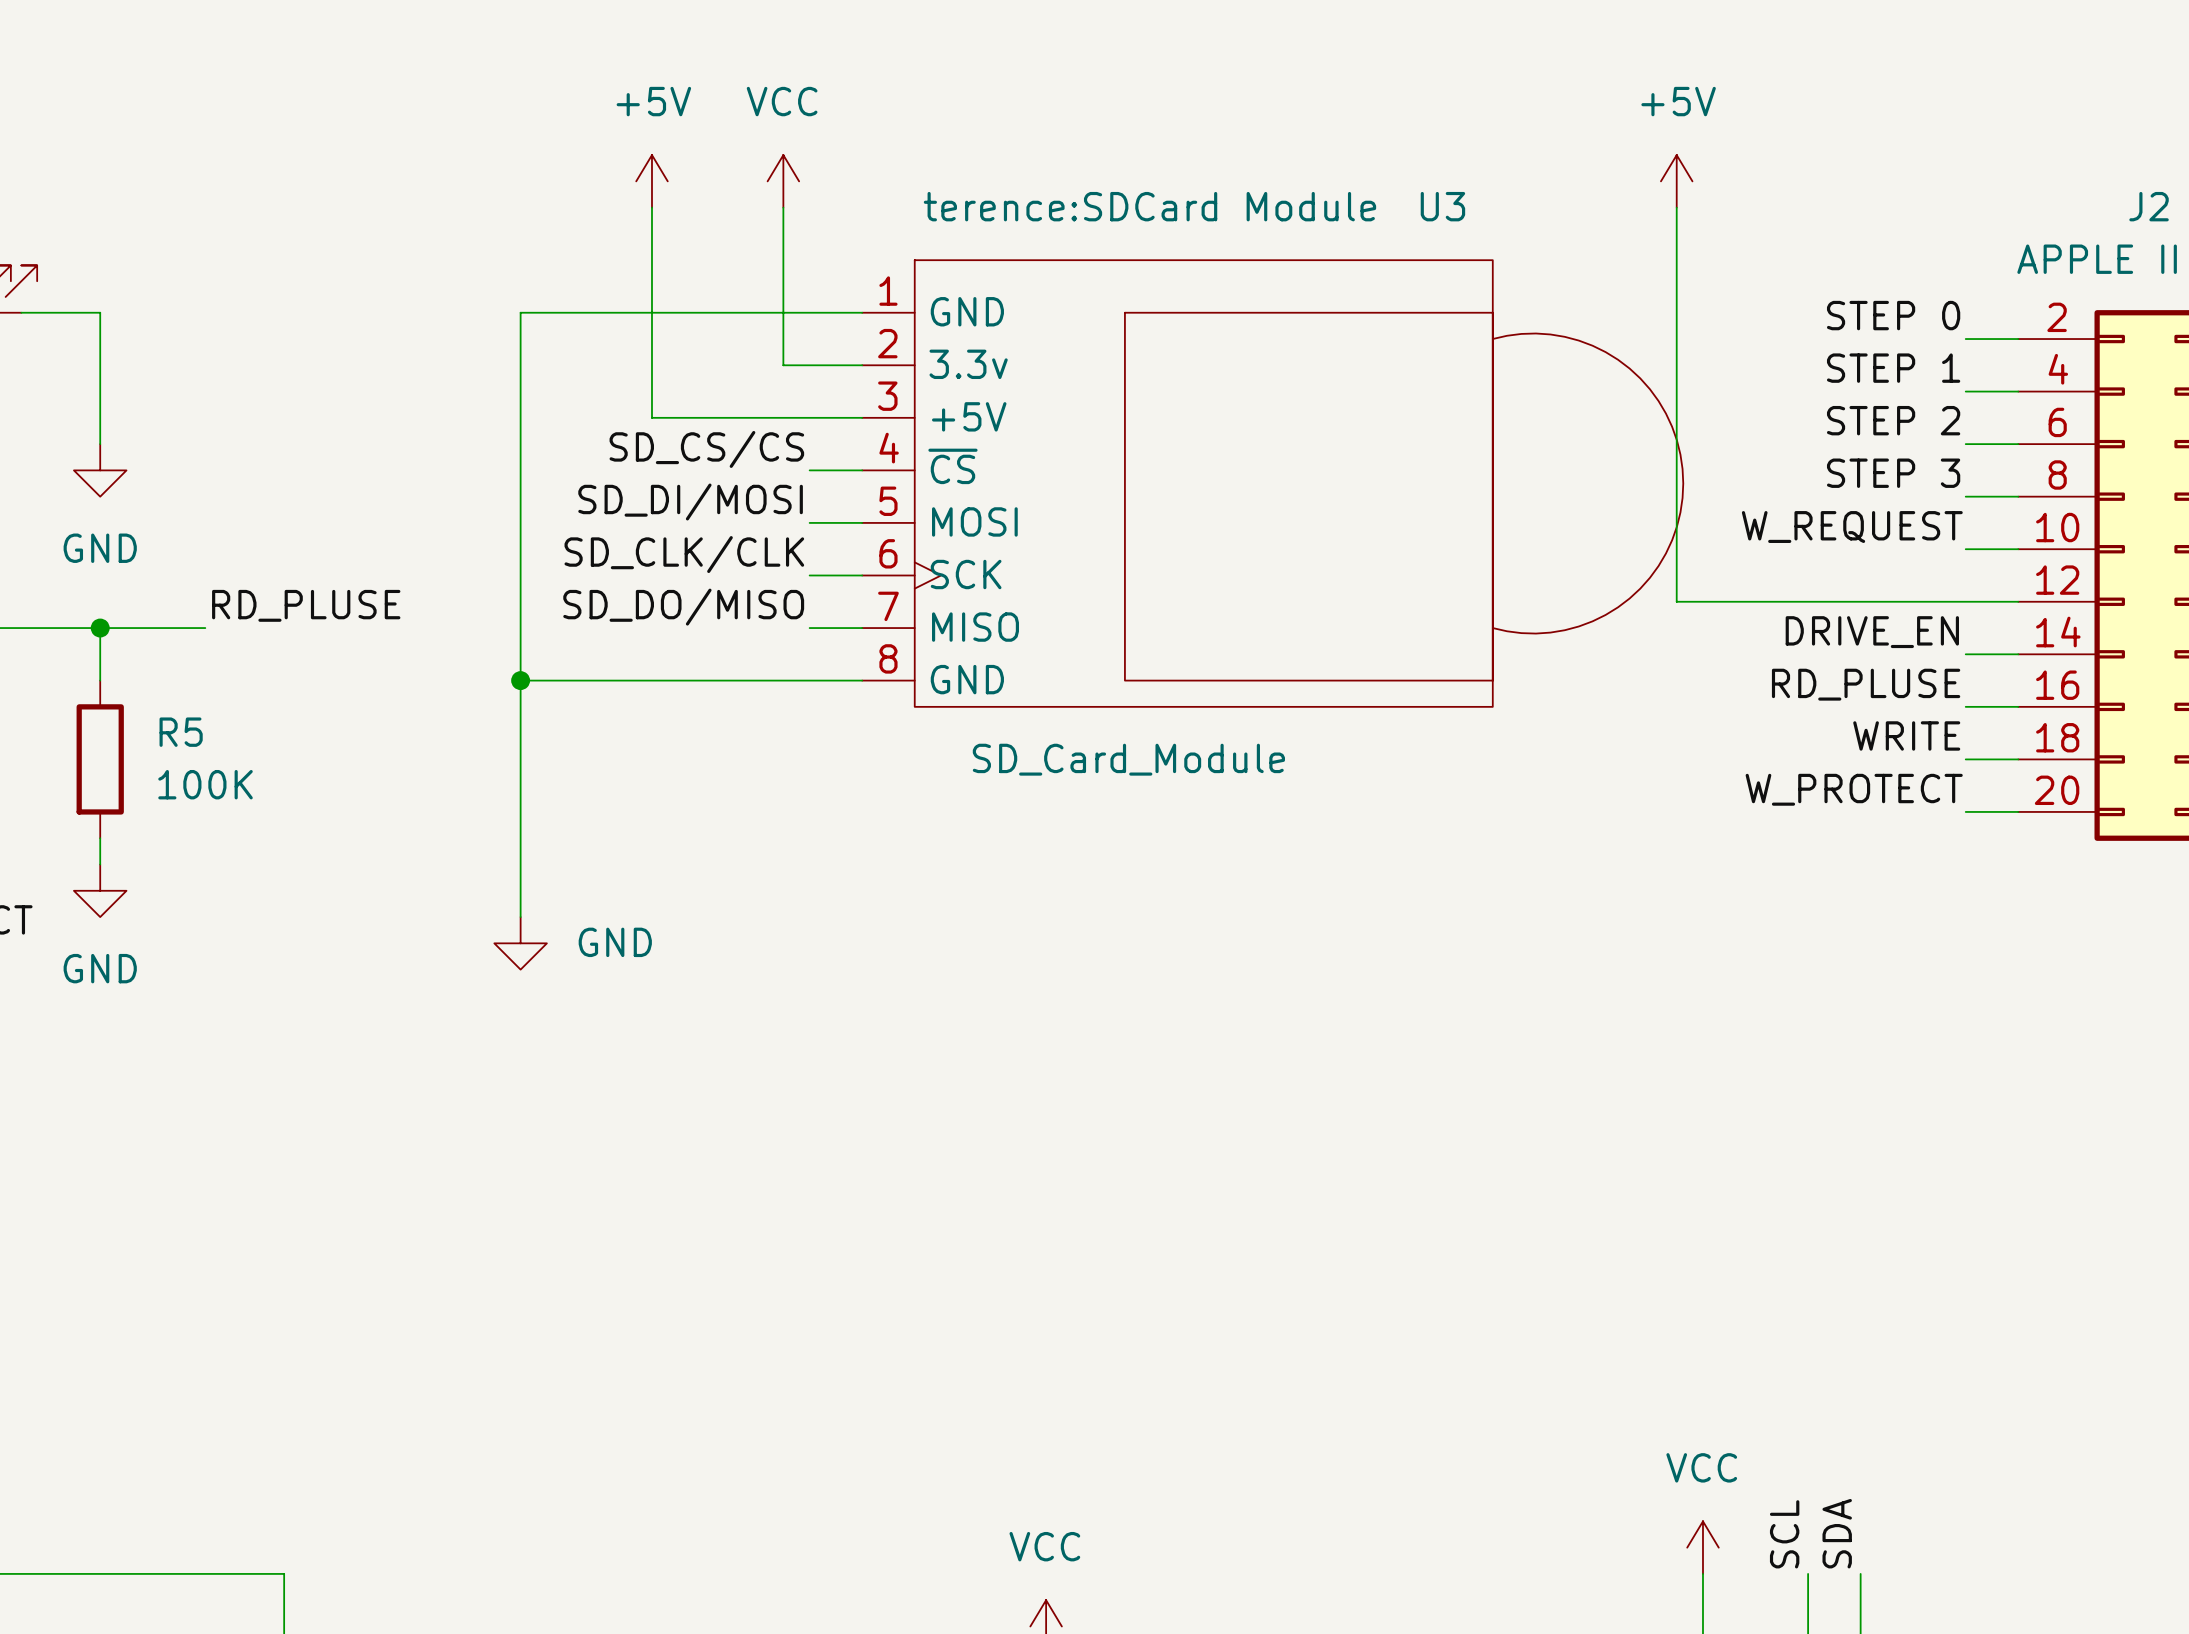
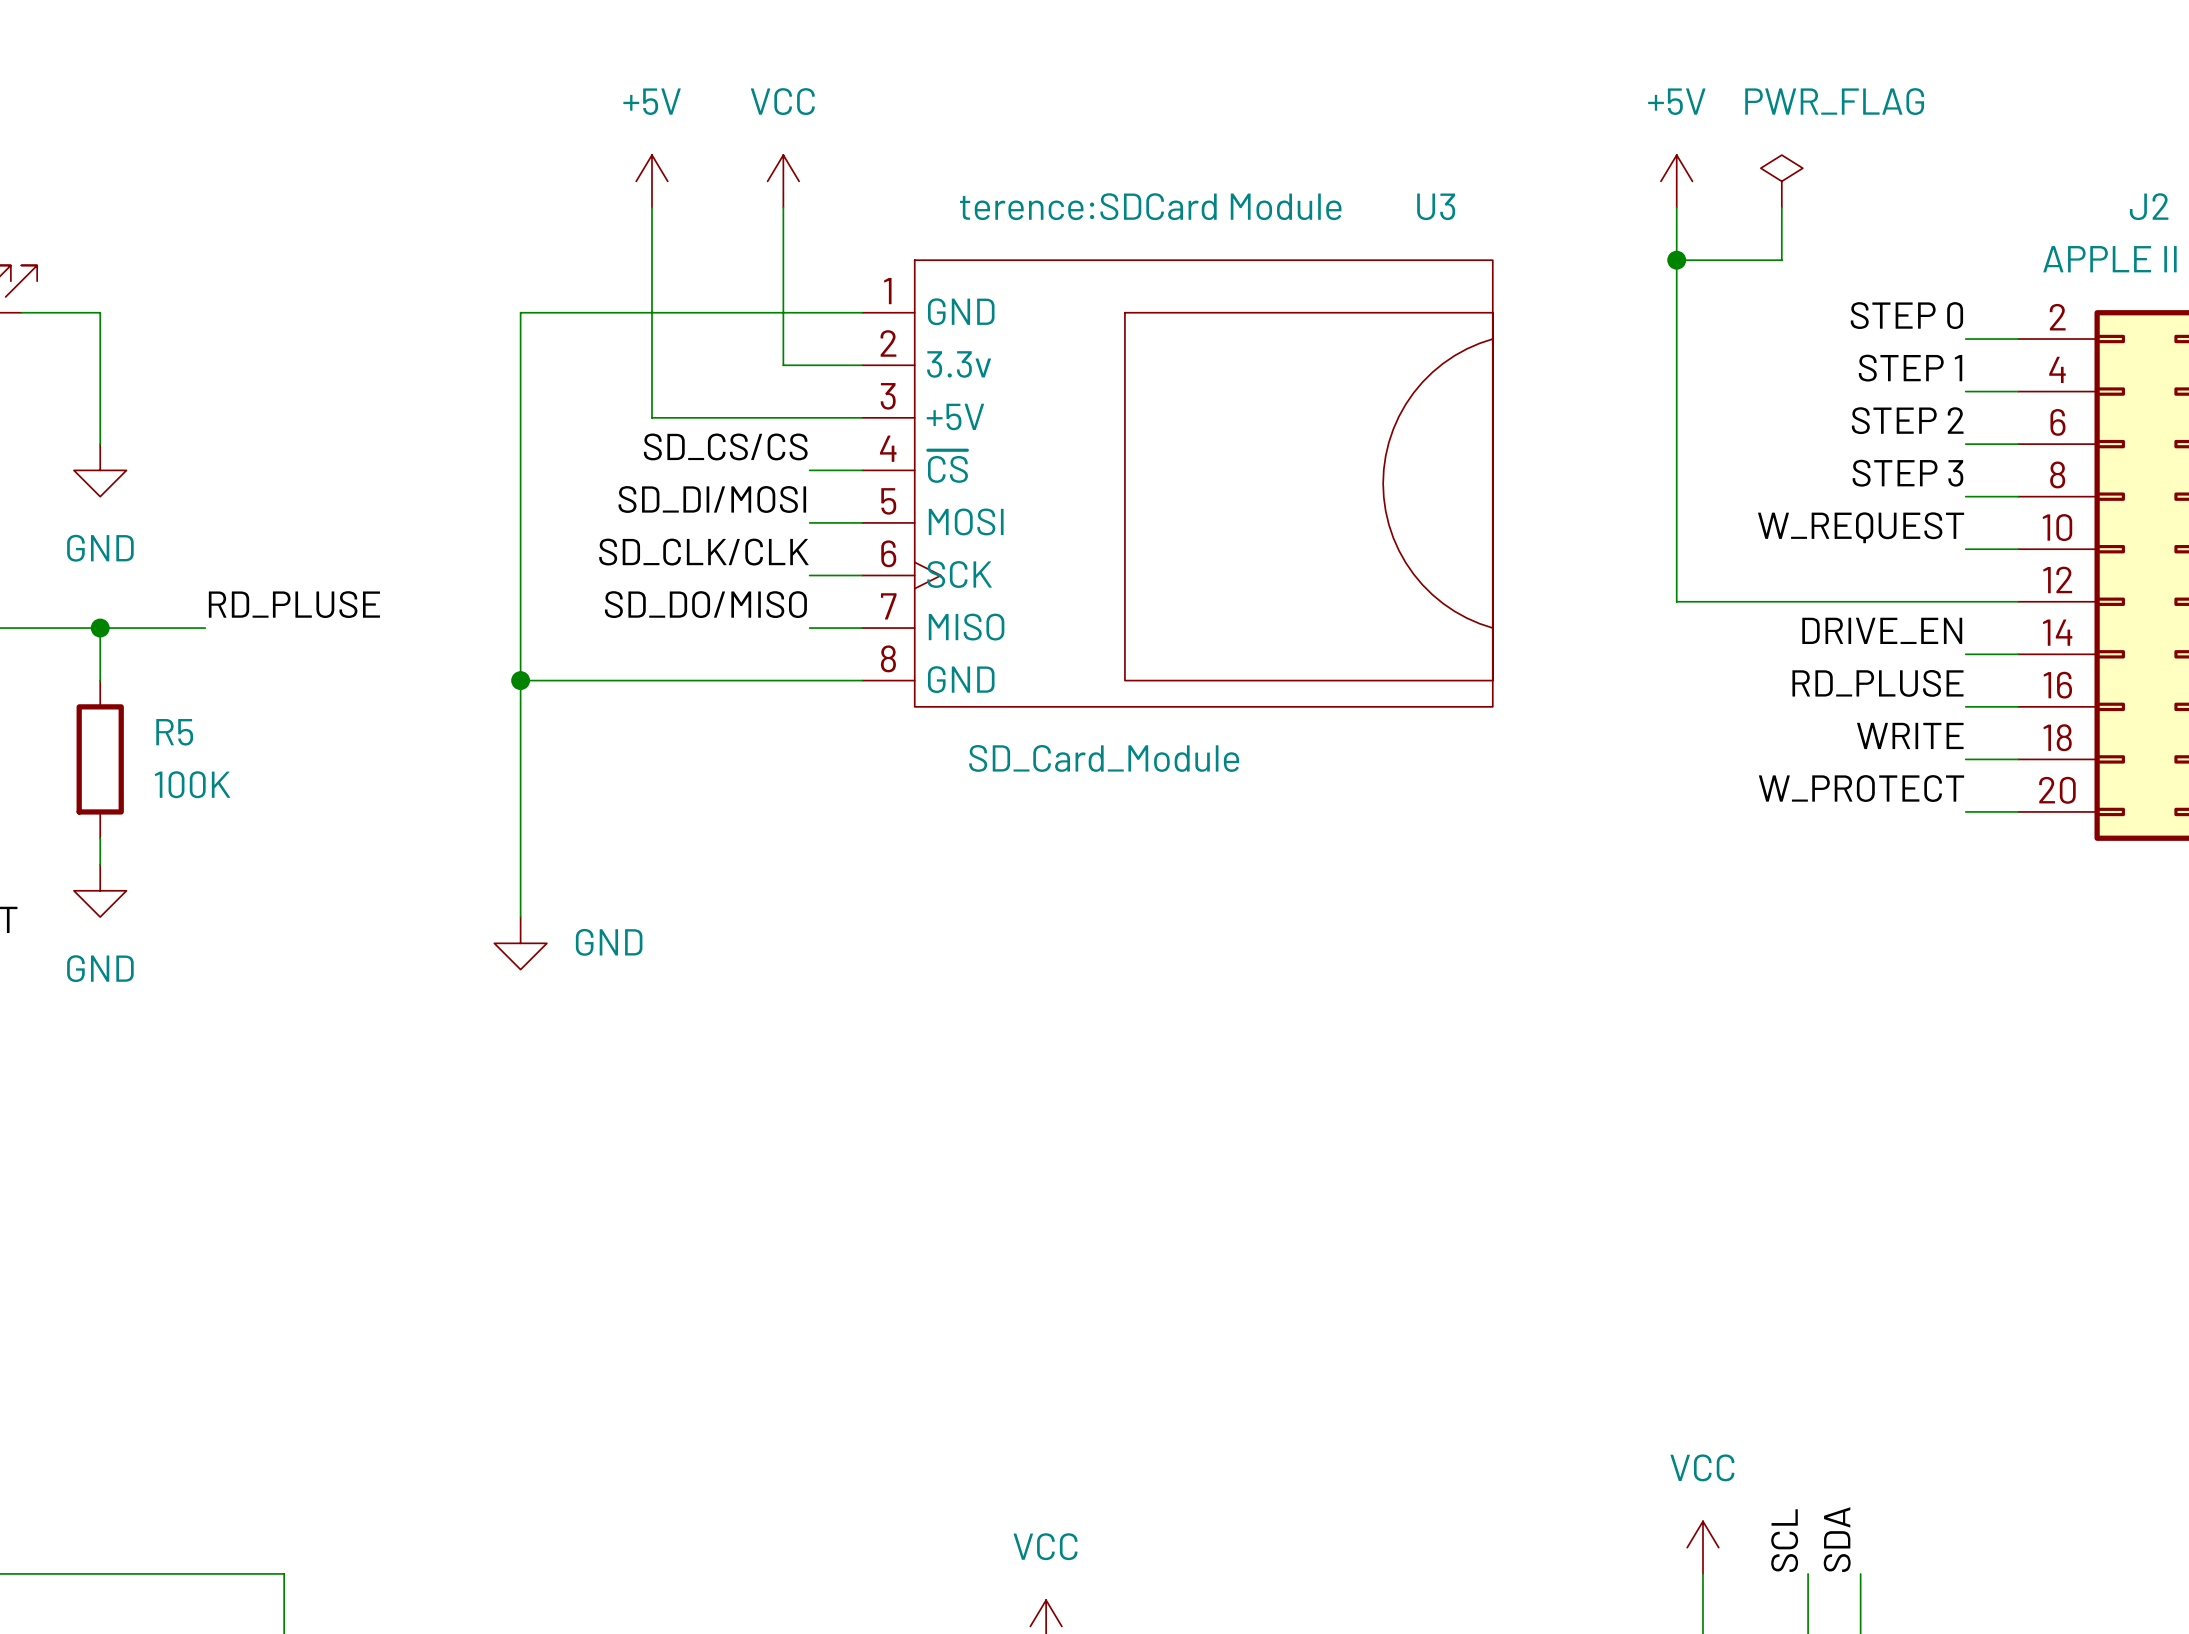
power symbol: none -> PWR_FLAG (1781, 181)
wire: none -> (1781, 207) (1781, 260) (1676, 260)
U3 symbol: [862, 260, 1684, 707] -> [862, 260, 1493, 707]
junction: none -> (1676, 260)

